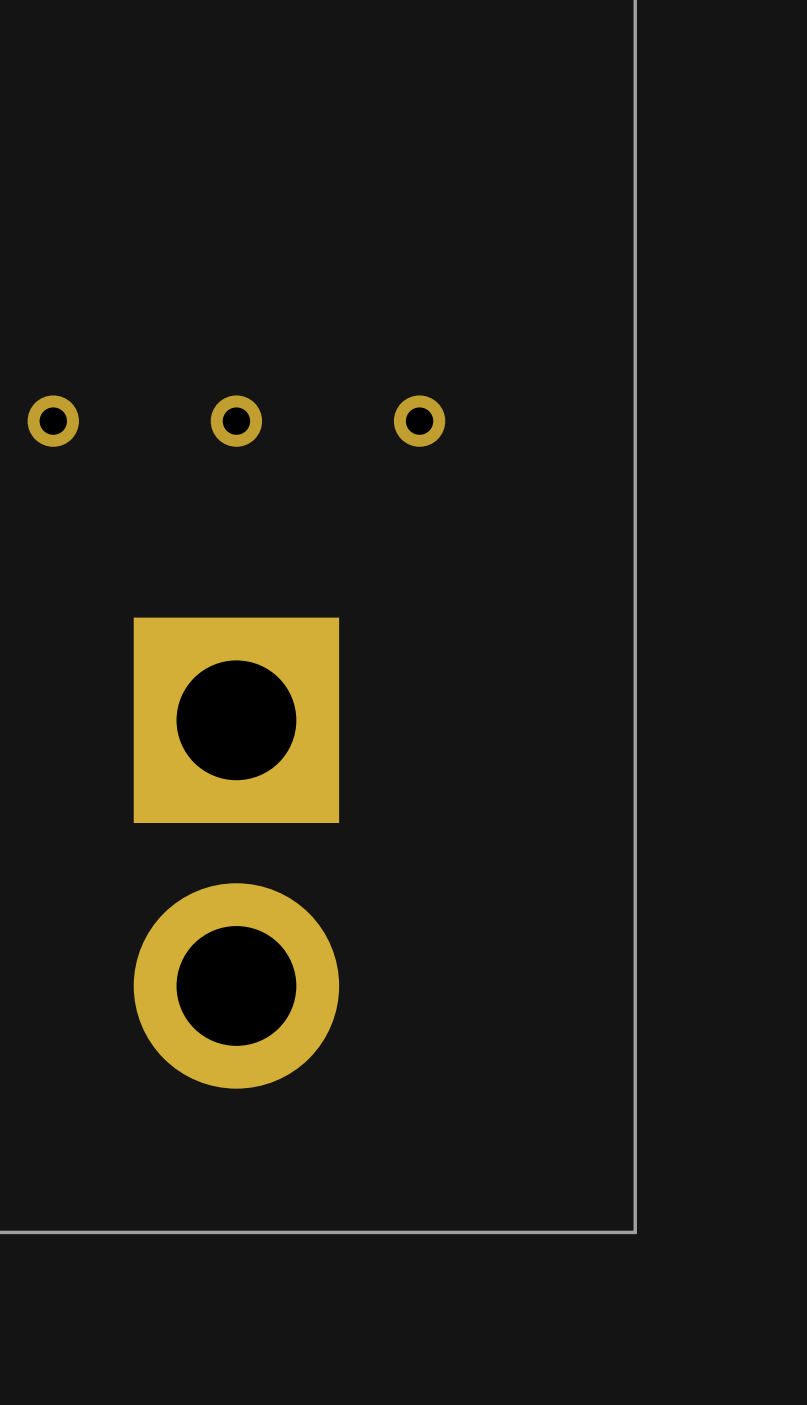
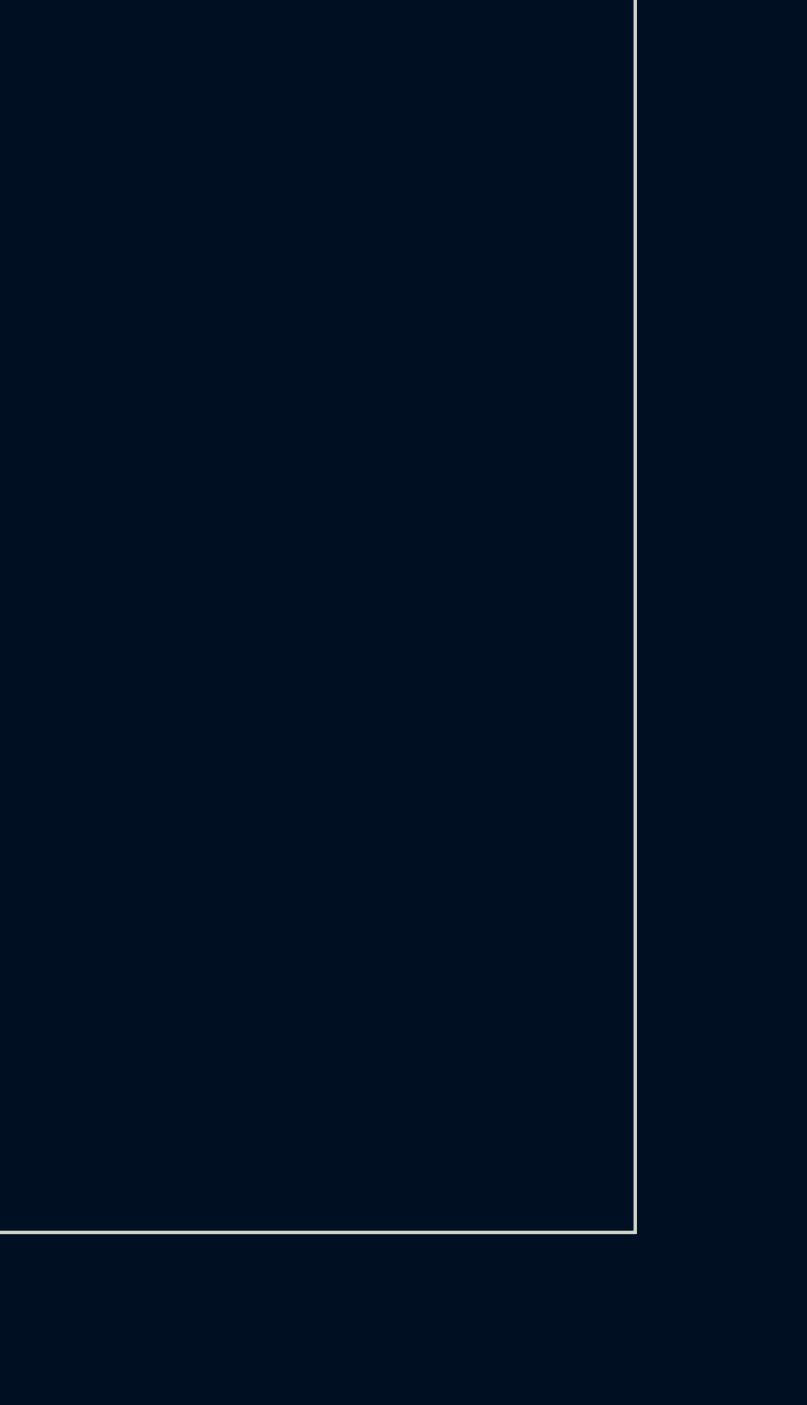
via: (53, 421) -> none
via: (236, 421) -> none
via: (419, 421) -> none
part: (236, 853) -> none

